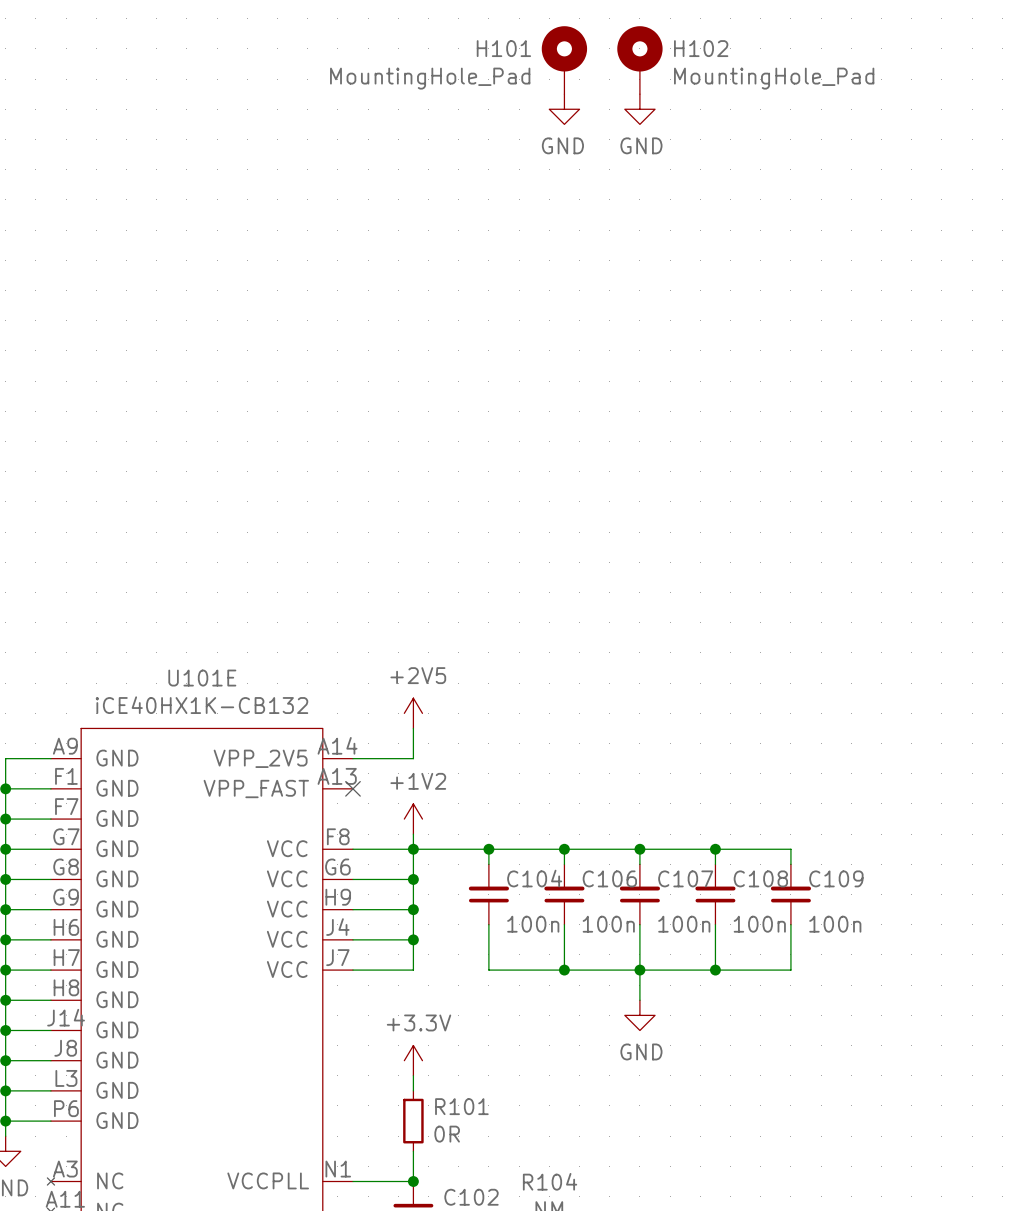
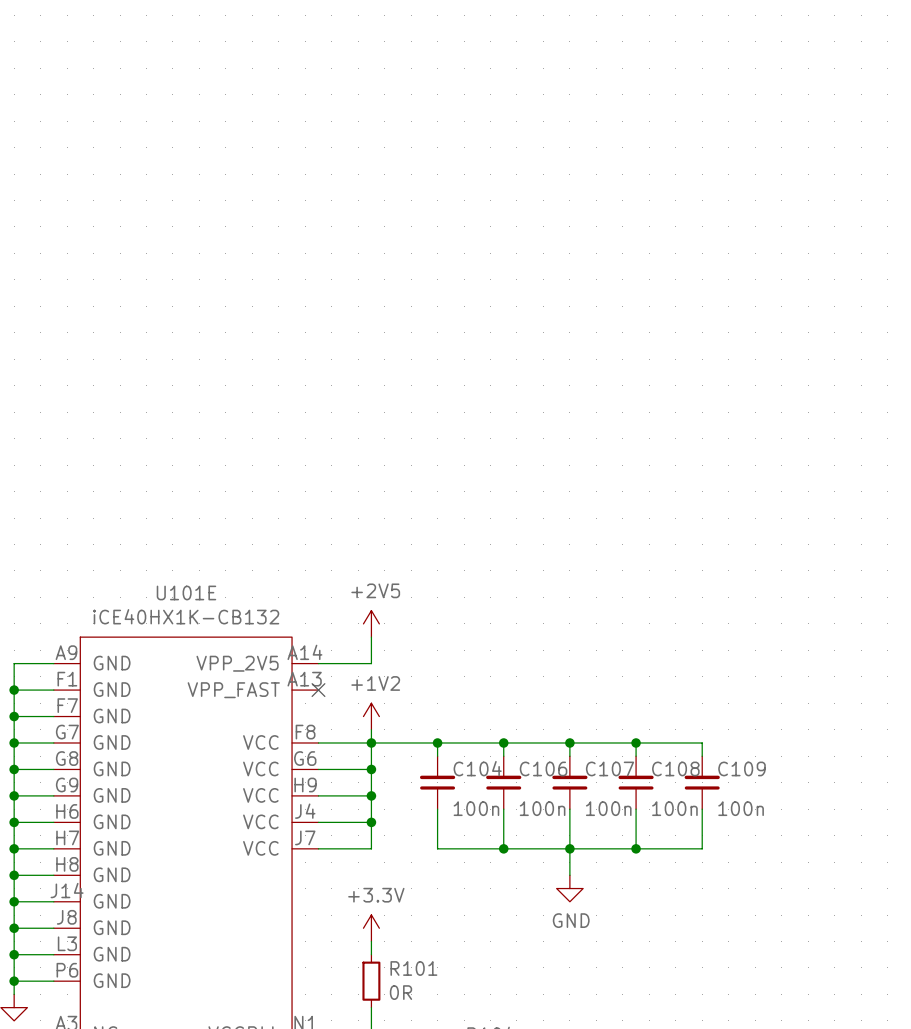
H101: MountingHole_Pad (564, 60) -> none
H102: MountingHole_Pad (639, 60) -> none
power symbol: GND (564, 109) -> none
power symbol: GND (639, 109) -> none

